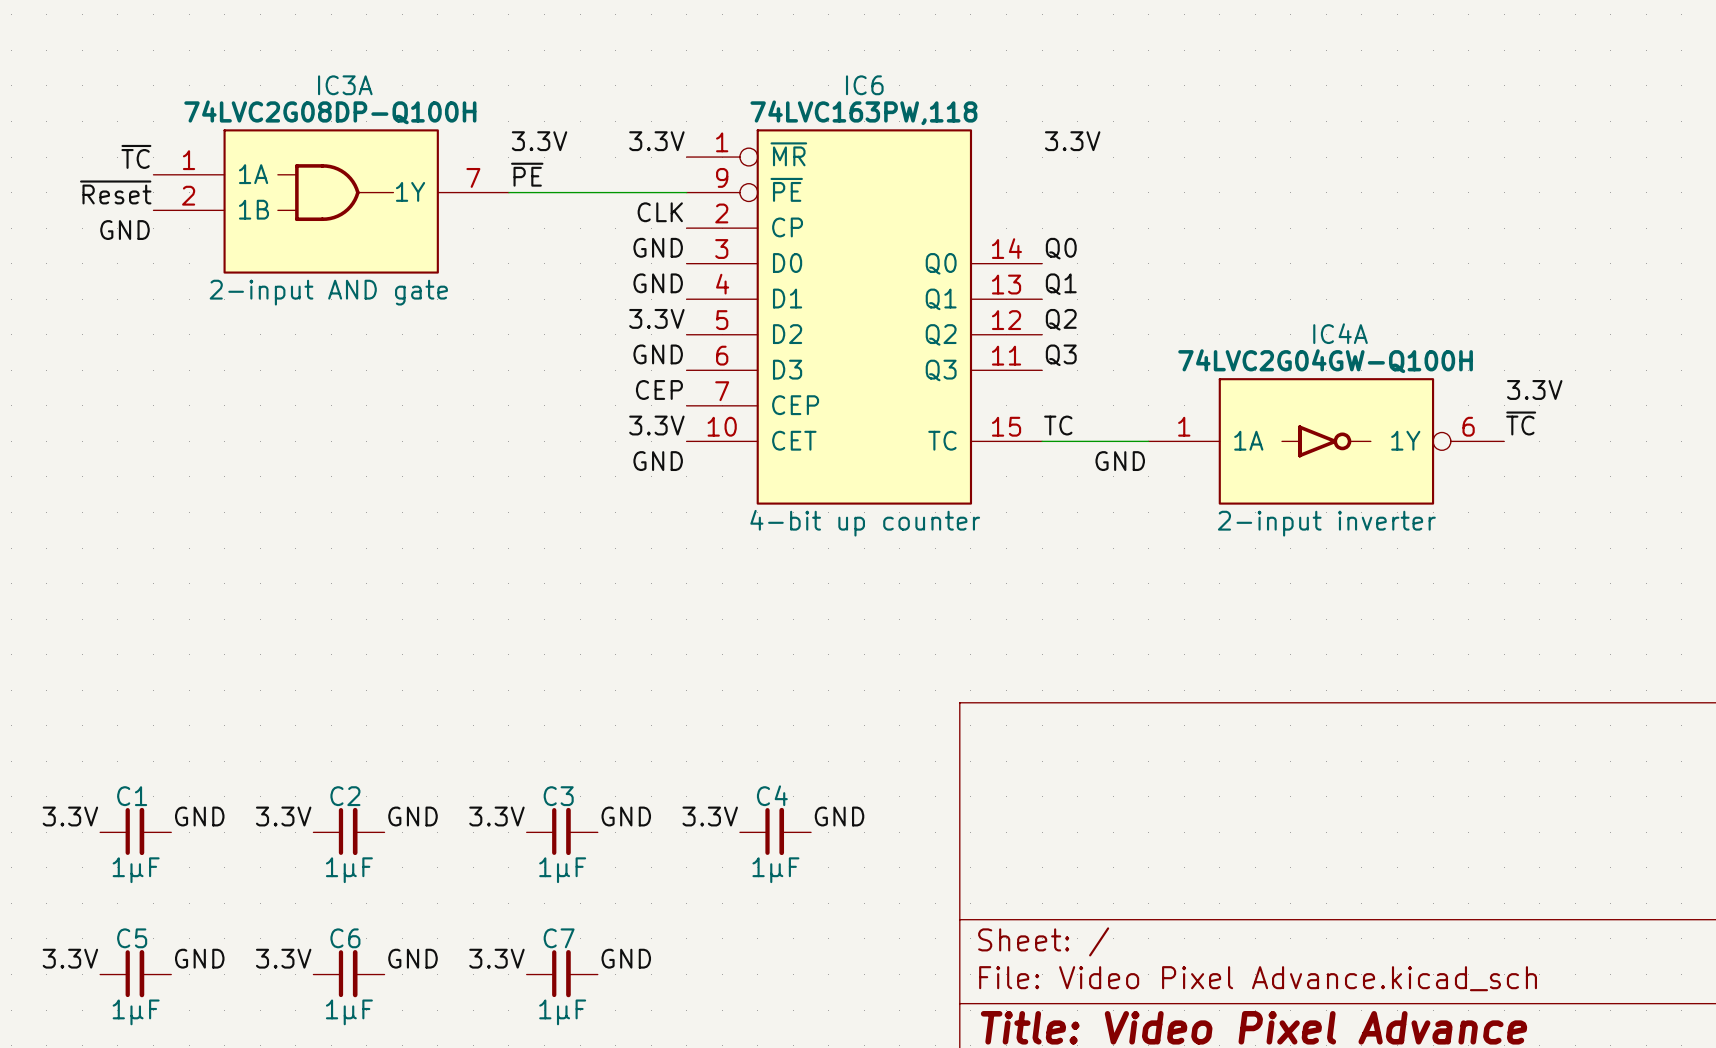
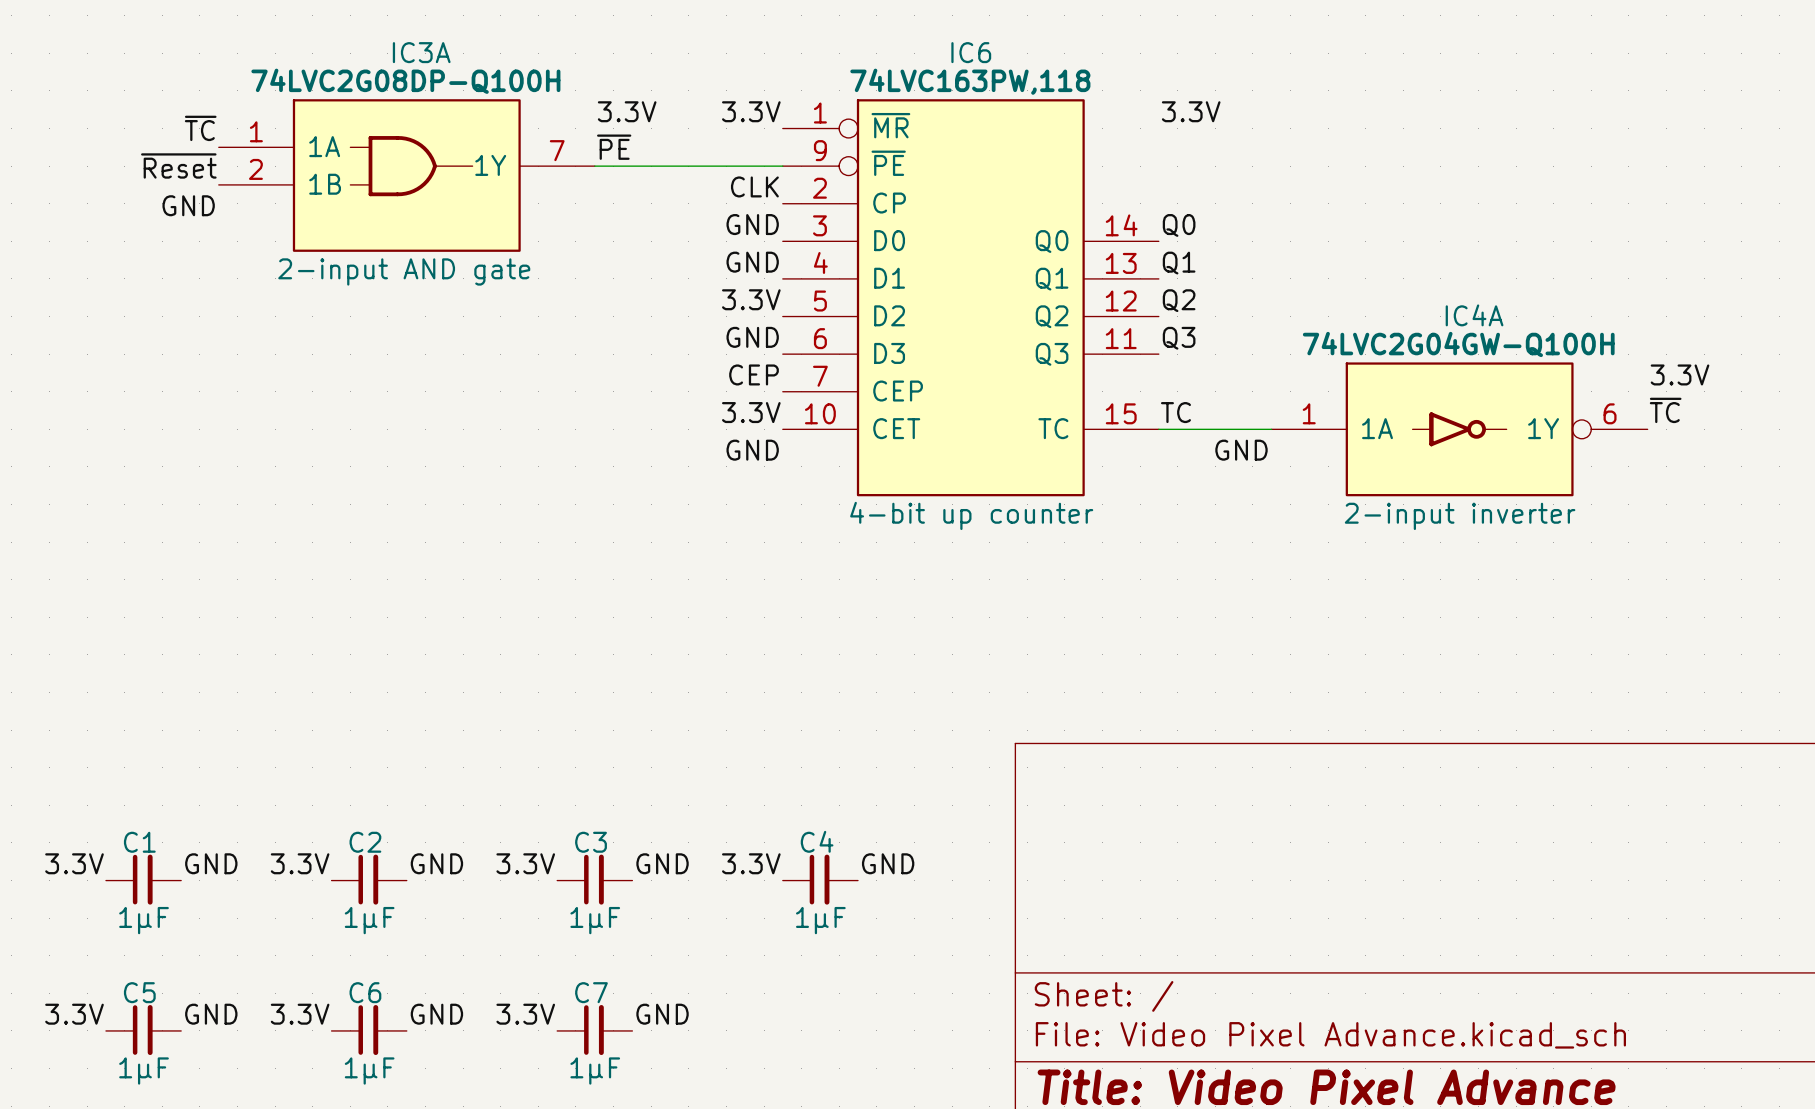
label position: 3.3V (539, 141) -> 3.3V (627, 111)
label position: 3.3V (656, 141) -> 3.3V (751, 111)
label position: 3.3V (1072, 141) -> 3.3V (1191, 111)
label position: ~{TC} (136, 156) -> ~{TC} (200, 128)
label position: ~{PE} (527, 174) -> ~{PE} (614, 147)
label position: ~{Reset} (115, 192) -> ~{Reset} (178, 165)
wire: (508, 192) (686, 192) -> (594, 166) (782, 166)
IC3A position: (331, 201) -> (406, 175)
label position: CLK (660, 212) -> CLK (754, 186)
label: none -> GND (752, 224)
label position: GND (125, 230) -> GND (188, 205)
label: GND (658, 247) -> none
label: none -> GND (752, 262)
label position: Q0 (1061, 248) -> Q0 (1179, 225)
label: GND (658, 283) -> none
label position: Q1 (1061, 284) -> Q1 (1179, 263)
IC6 position: (864, 316) -> (970, 297)
label position: 3.3V (656, 318) -> 3.3V (751, 299)
label: none -> GND (752, 337)
label position: Q2 (1061, 319) -> Q2 (1179, 300)
label: GND (658, 354) -> none
label position: Q3 (1061, 355) -> Q3 (1179, 338)
label position: CEP (659, 389) -> CEP (754, 374)
label position: 3.3V (1534, 389) -> 3.3V (1680, 374)
label position: ~{TC} (1521, 423) -> ~{TC} (1665, 410)
label position: 3.3V (656, 425) -> 3.3V (751, 412)
label position: TC (1058, 425) -> TC (1175, 412)
wire: (1042, 441) (1148, 441) -> (1158, 429) (1271, 429)
IC4A position: (1326, 441) -> (1459, 429)
label position: GND (658, 461) -> GND (752, 450)
label position: GND (1120, 461) -> GND (1241, 450)

